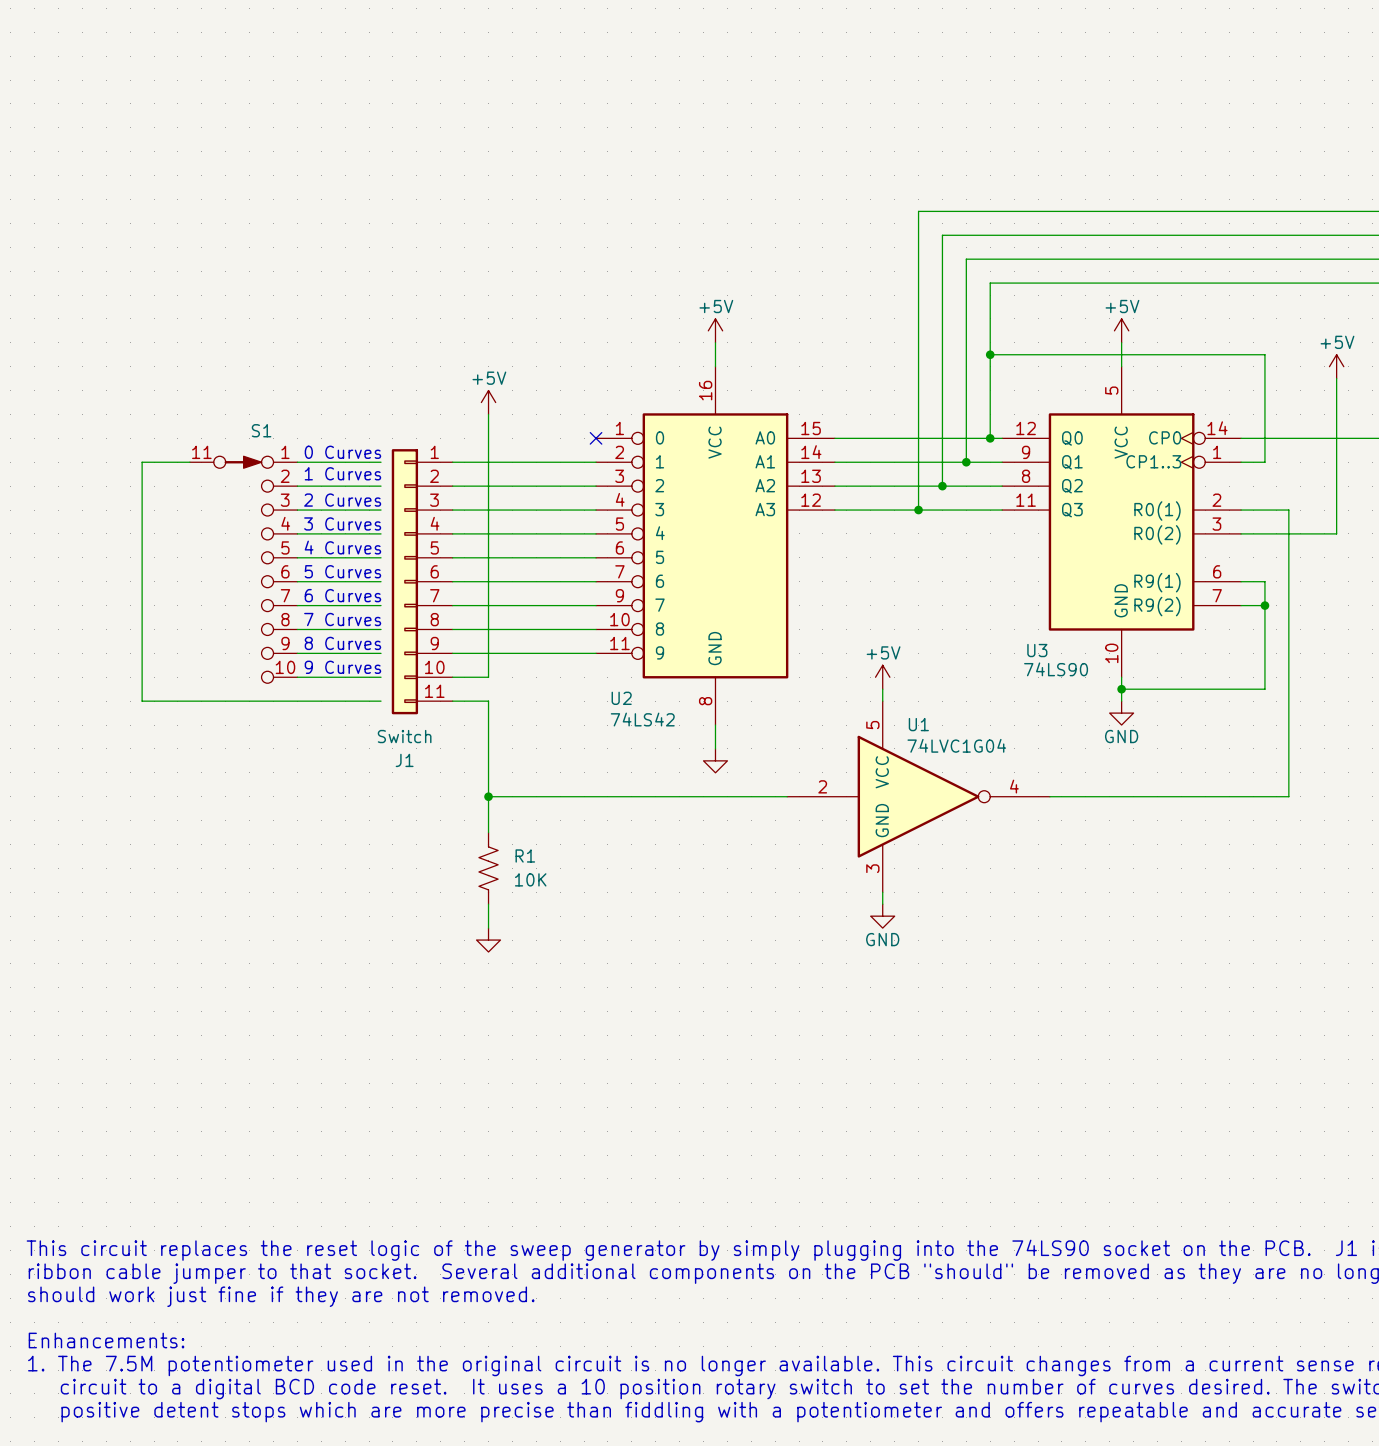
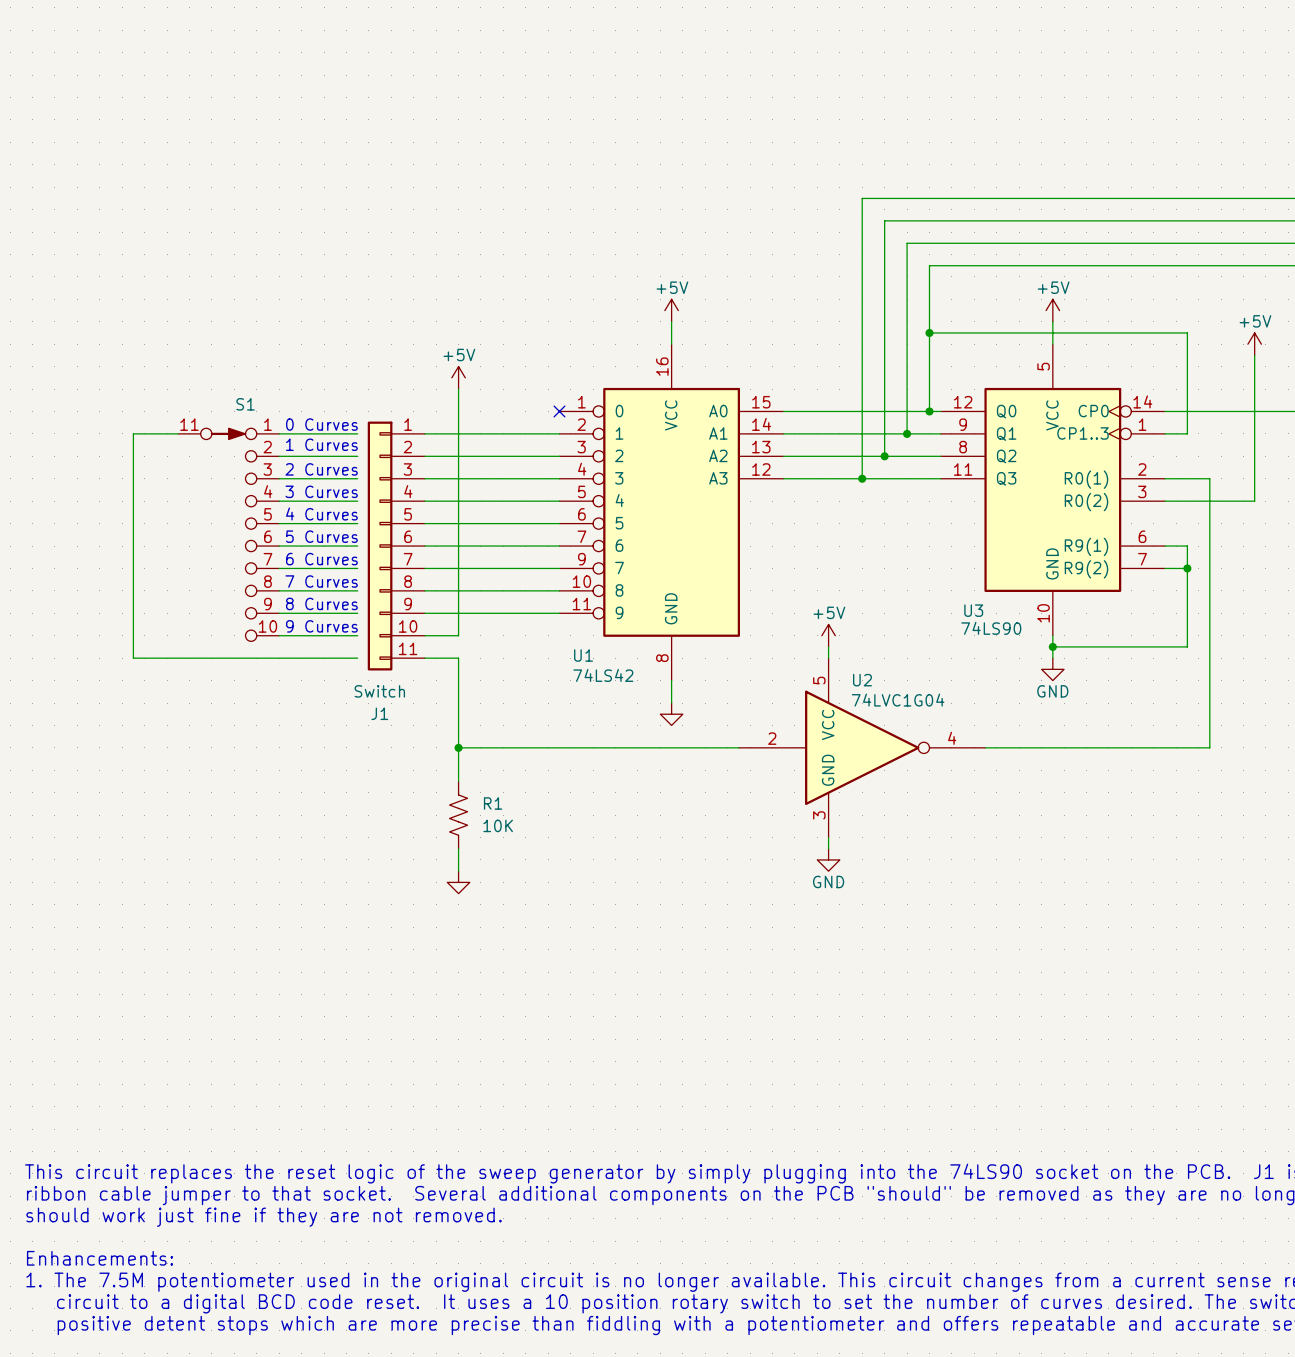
U2 name: U2 (621, 698) -> U1 (583, 655)
U1 name: U1 (918, 724) -> U2 (862, 680)

